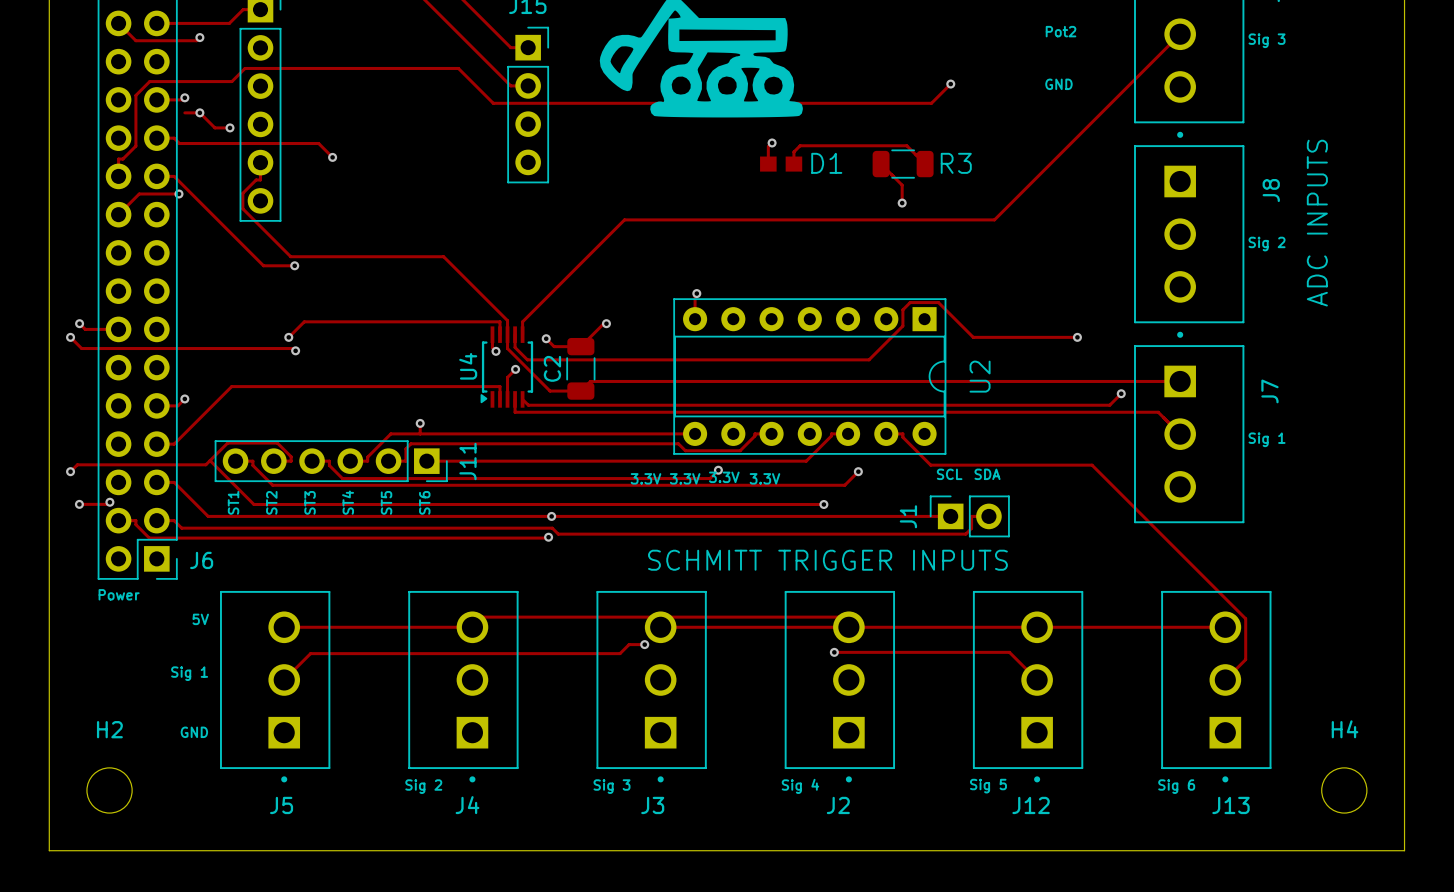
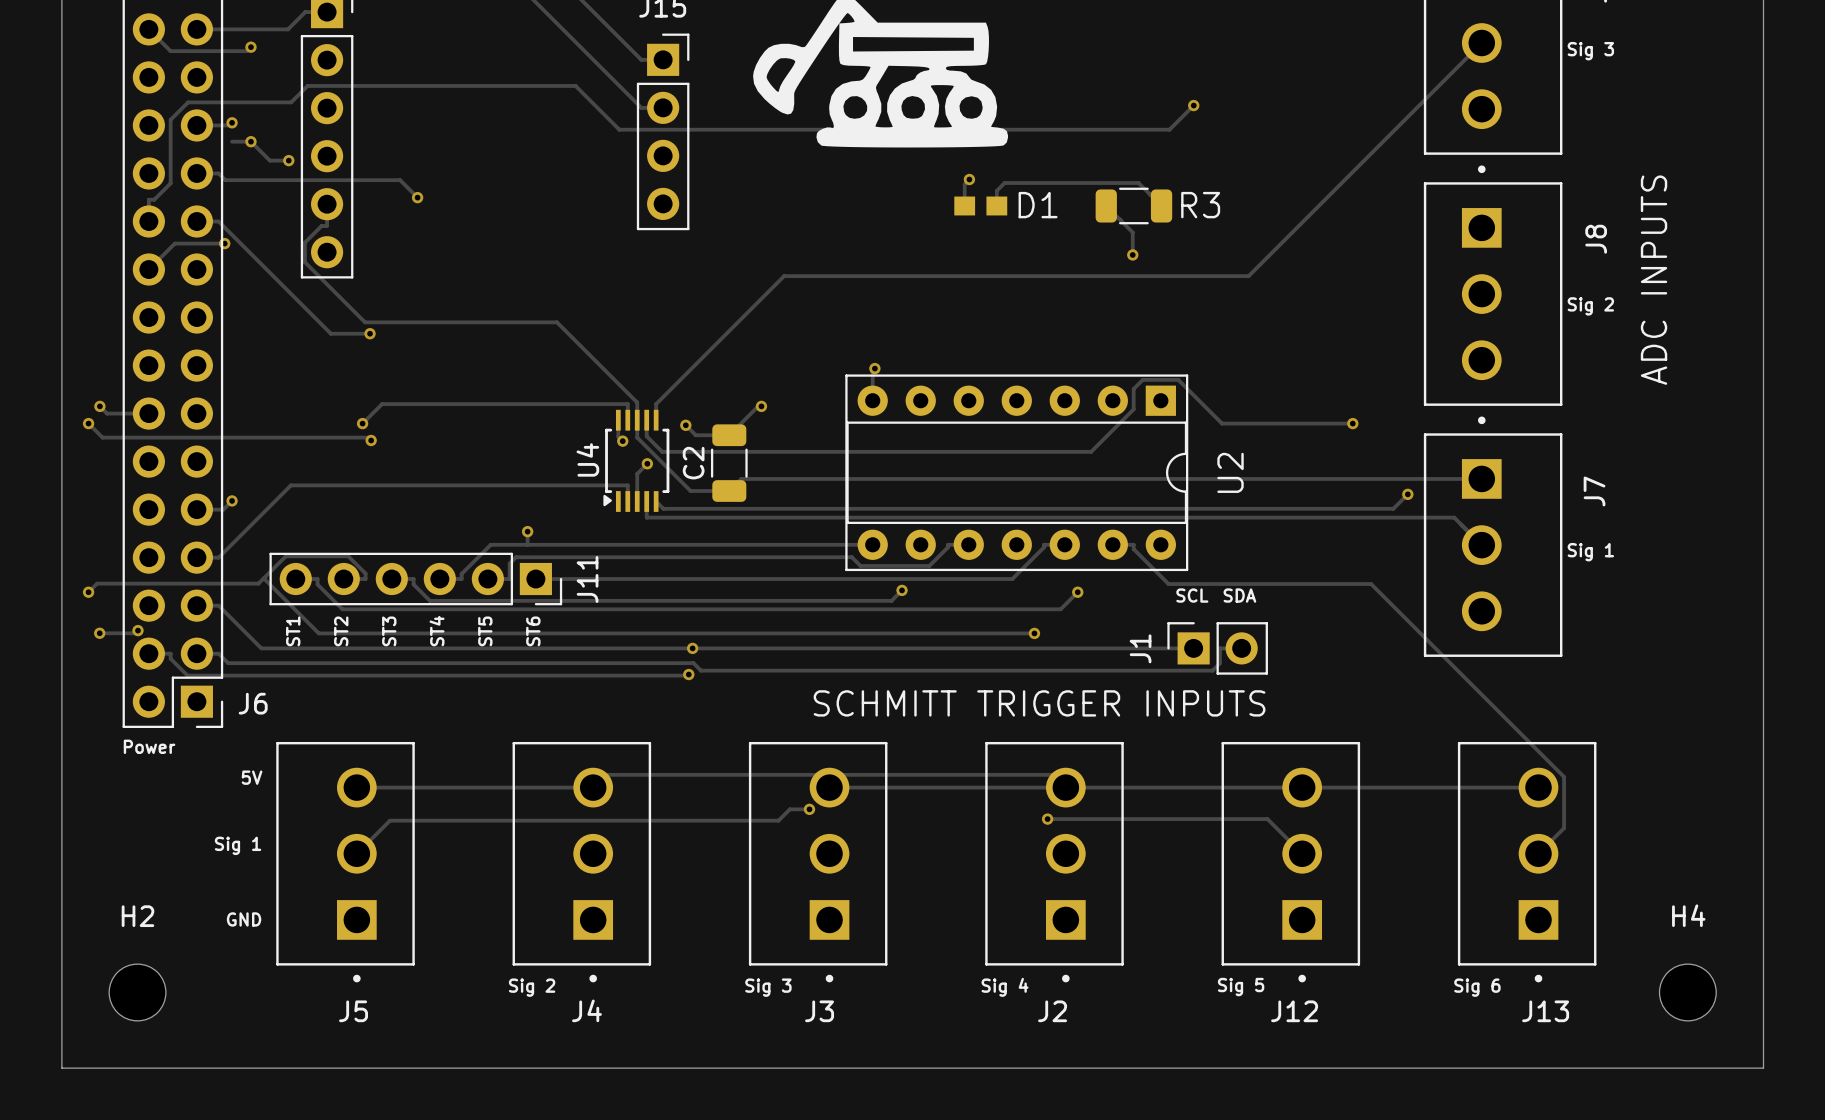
text: Pot2 (1061, 31) -> none
text: GND (1058, 84) -> none
text: 3.3V (724, 477) -> none
text: 3.3V (646, 478) -> none
text: 3.3V (685, 478) -> none
text: 3.3V (764, 478) -> none

